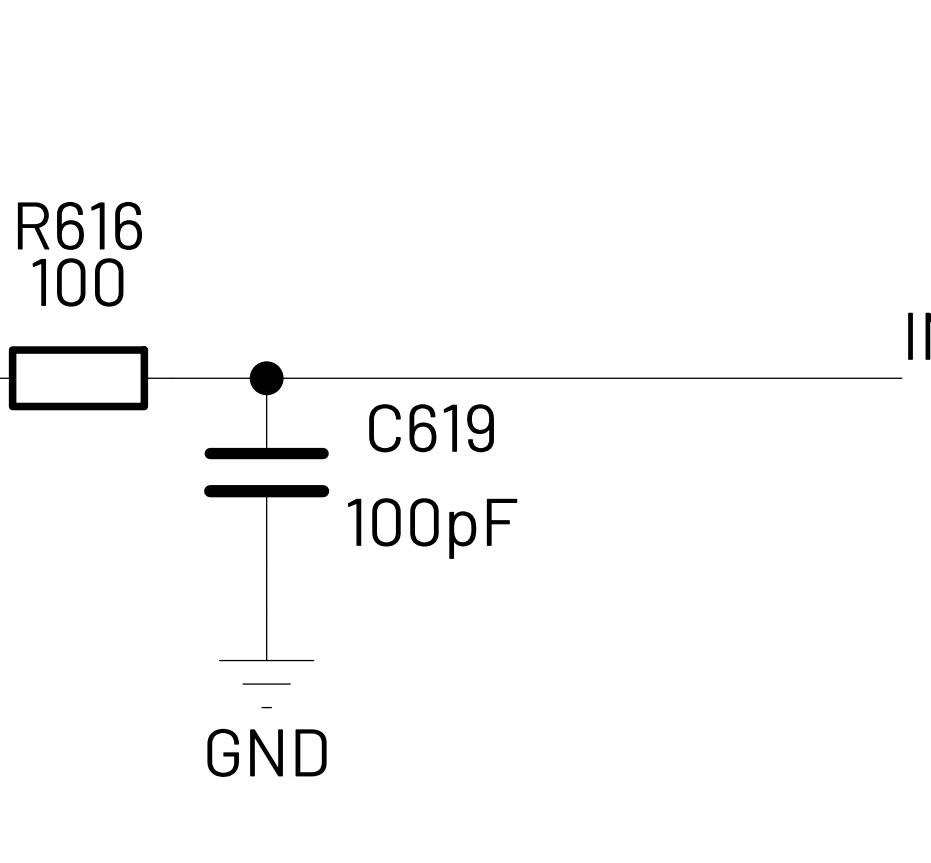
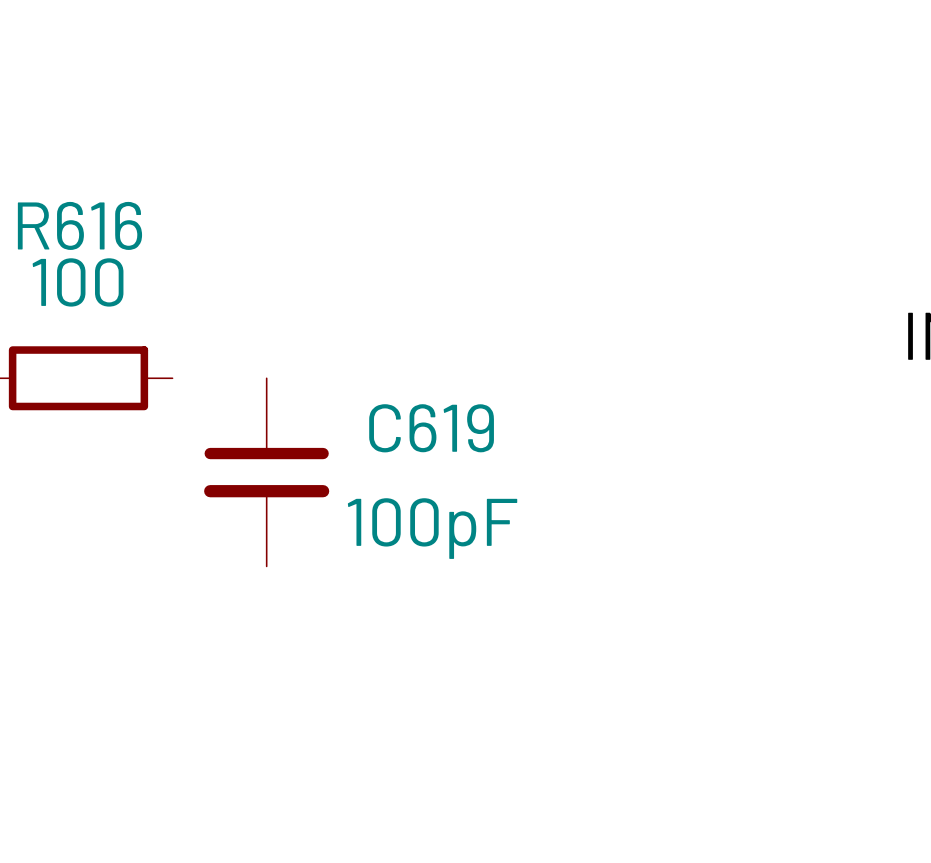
wire: (172, 378) (901, 378) -> none
junction: (266, 378) -> none
wire: (266, 566) (266, 613) -> none
power symbol: GND (266, 660) -> none

